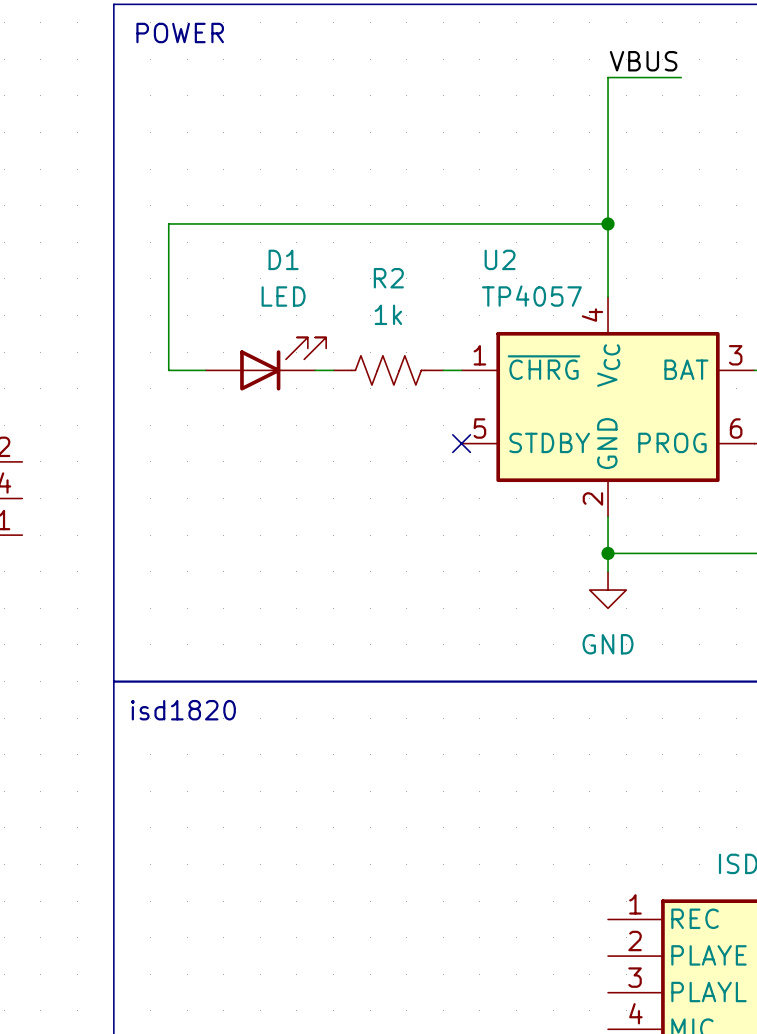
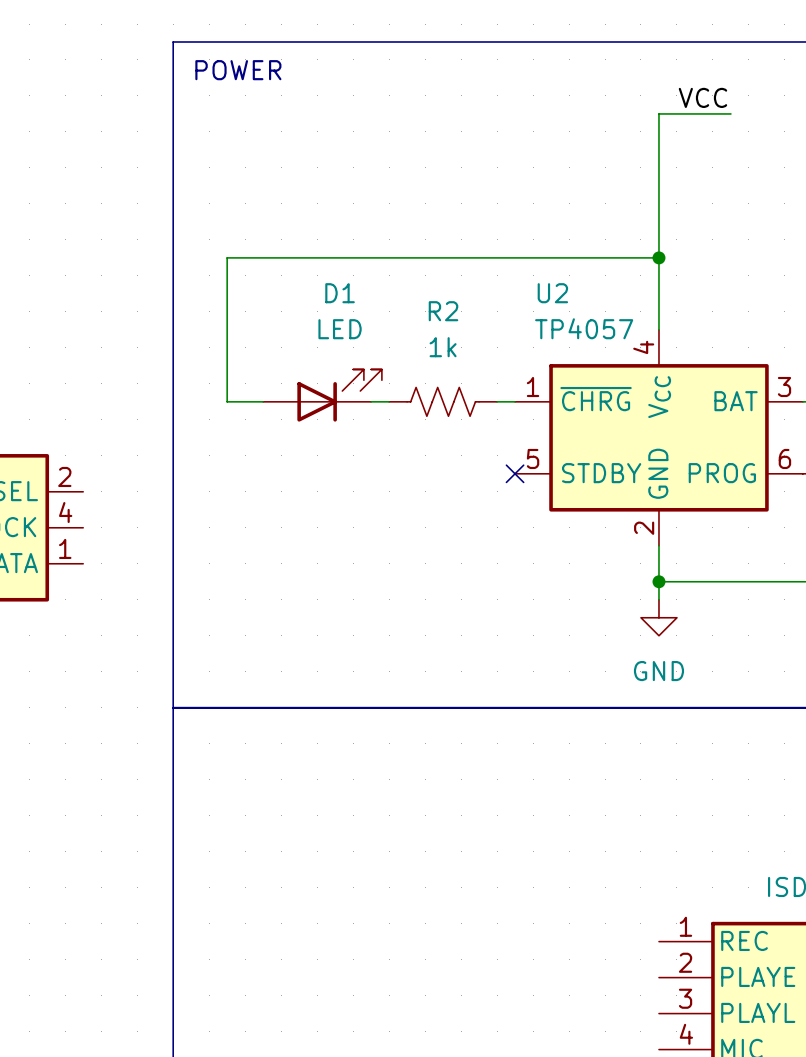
label: VBUS (643, 61) -> VCC (702, 97)
text: isd1820 (183, 710) -> none

